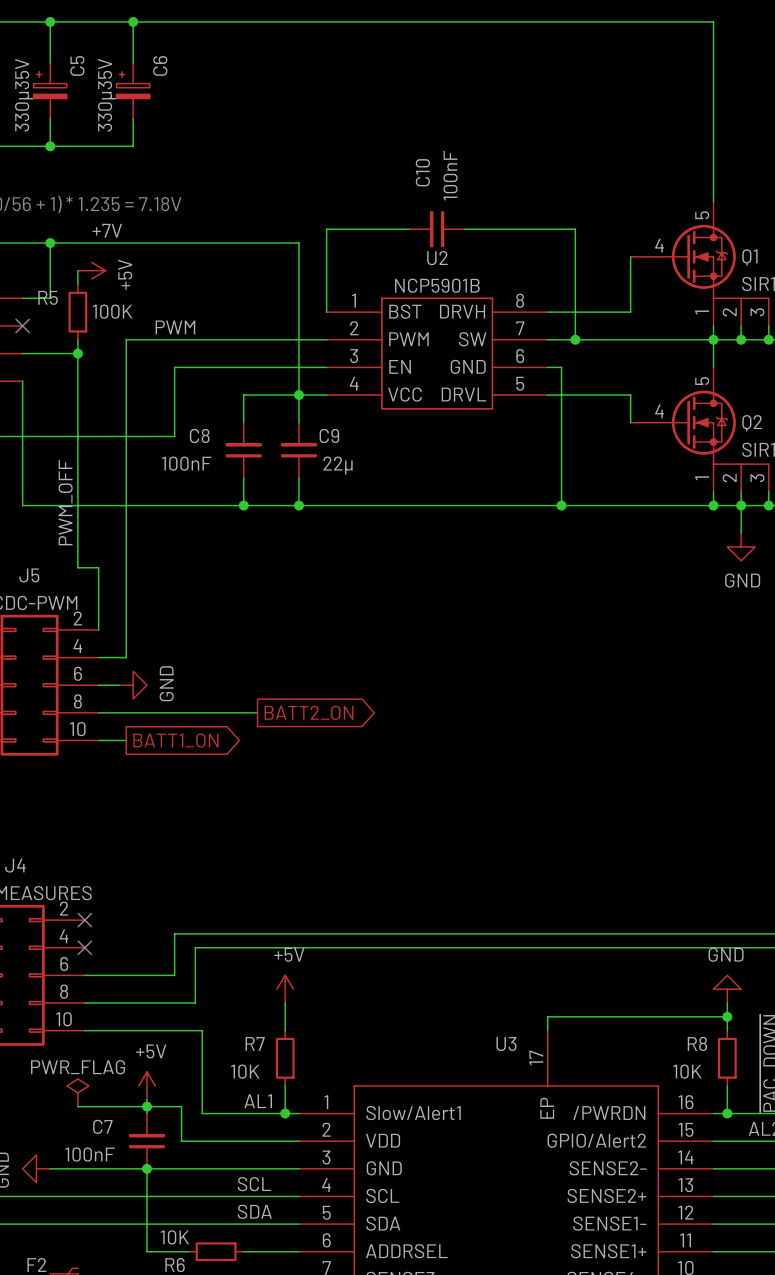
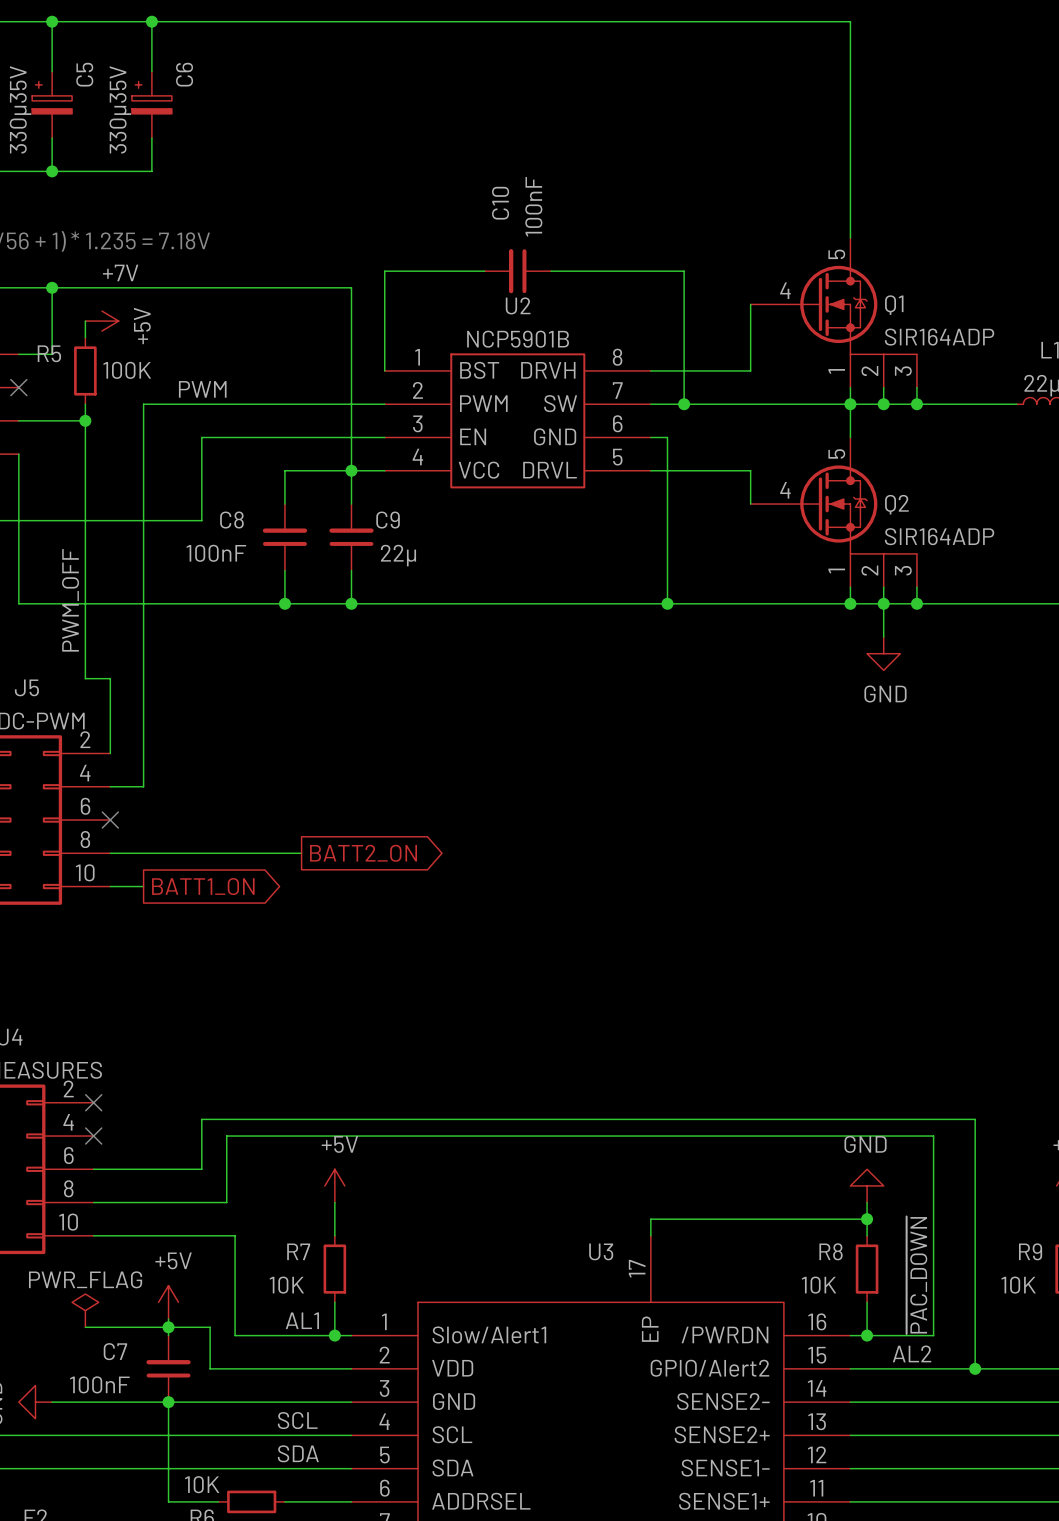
wire: (98, 685) (119, 685) -> none
no-connect mark: none -> (110, 820)
power symbol: GND (133, 685) -> none

